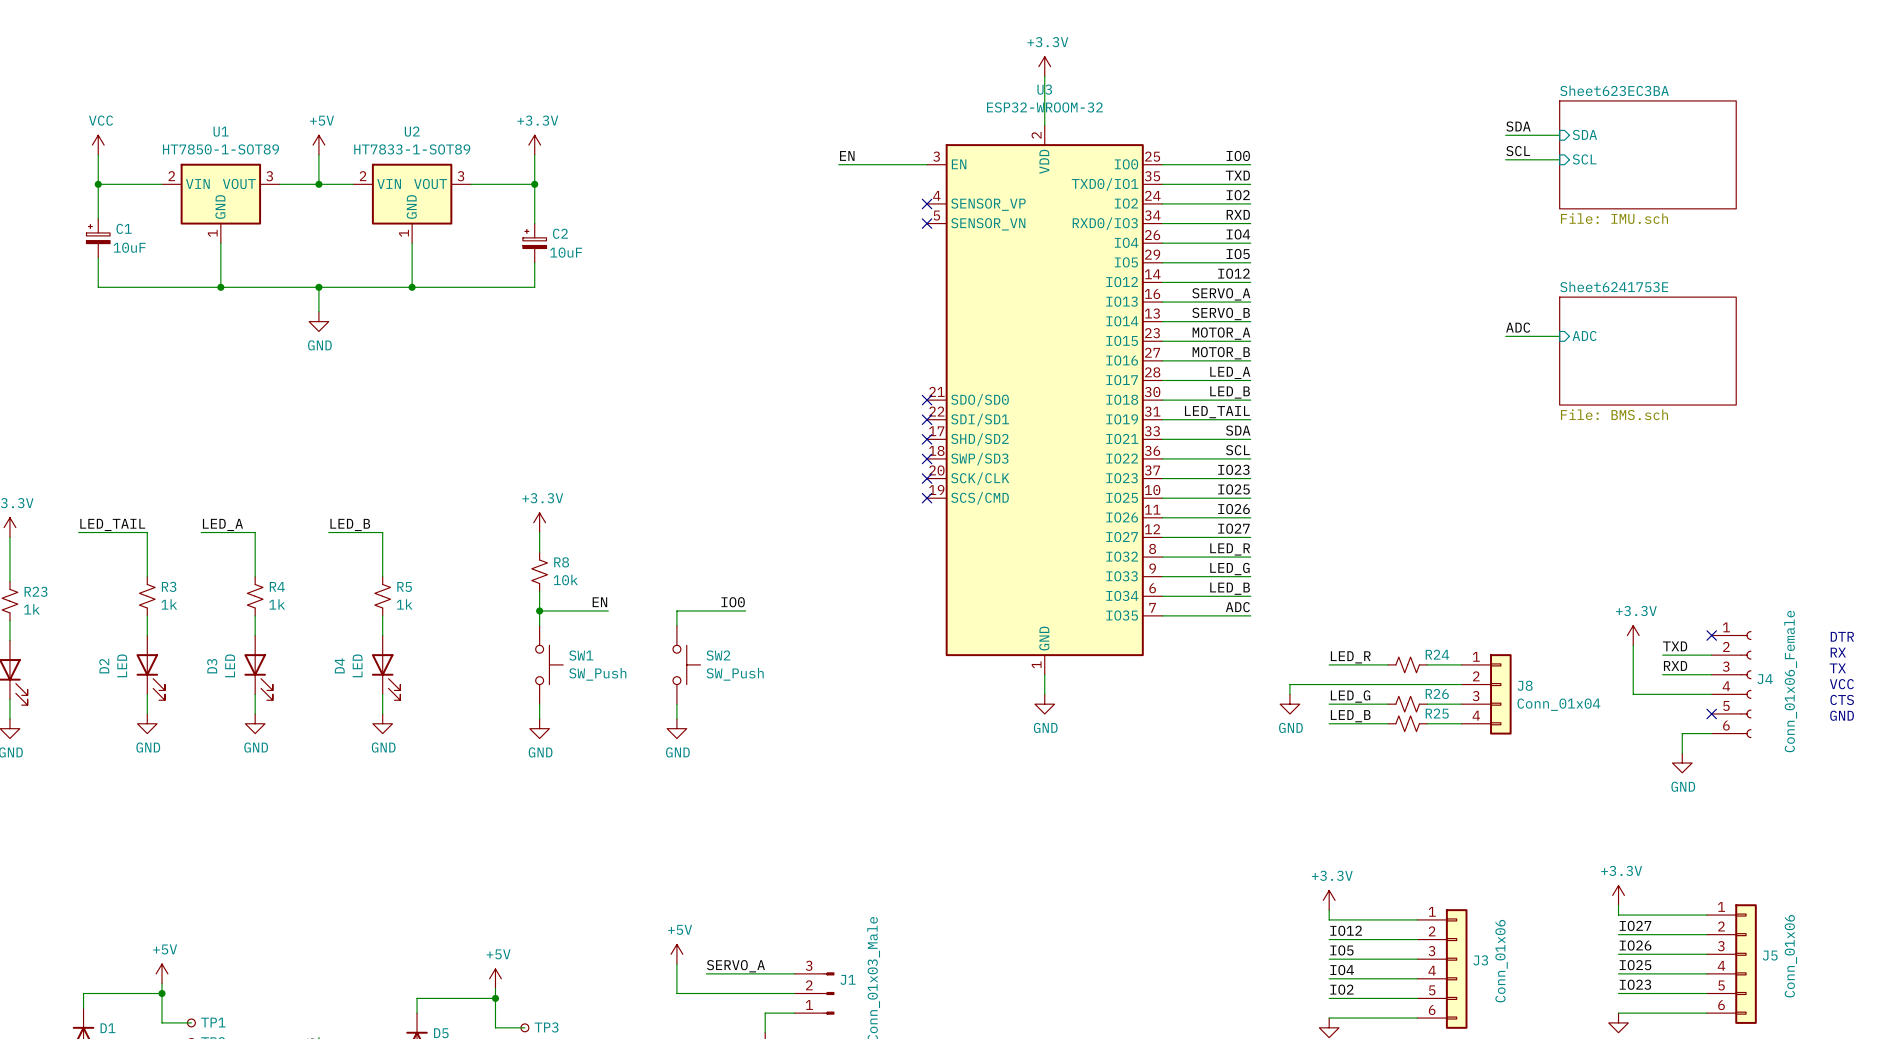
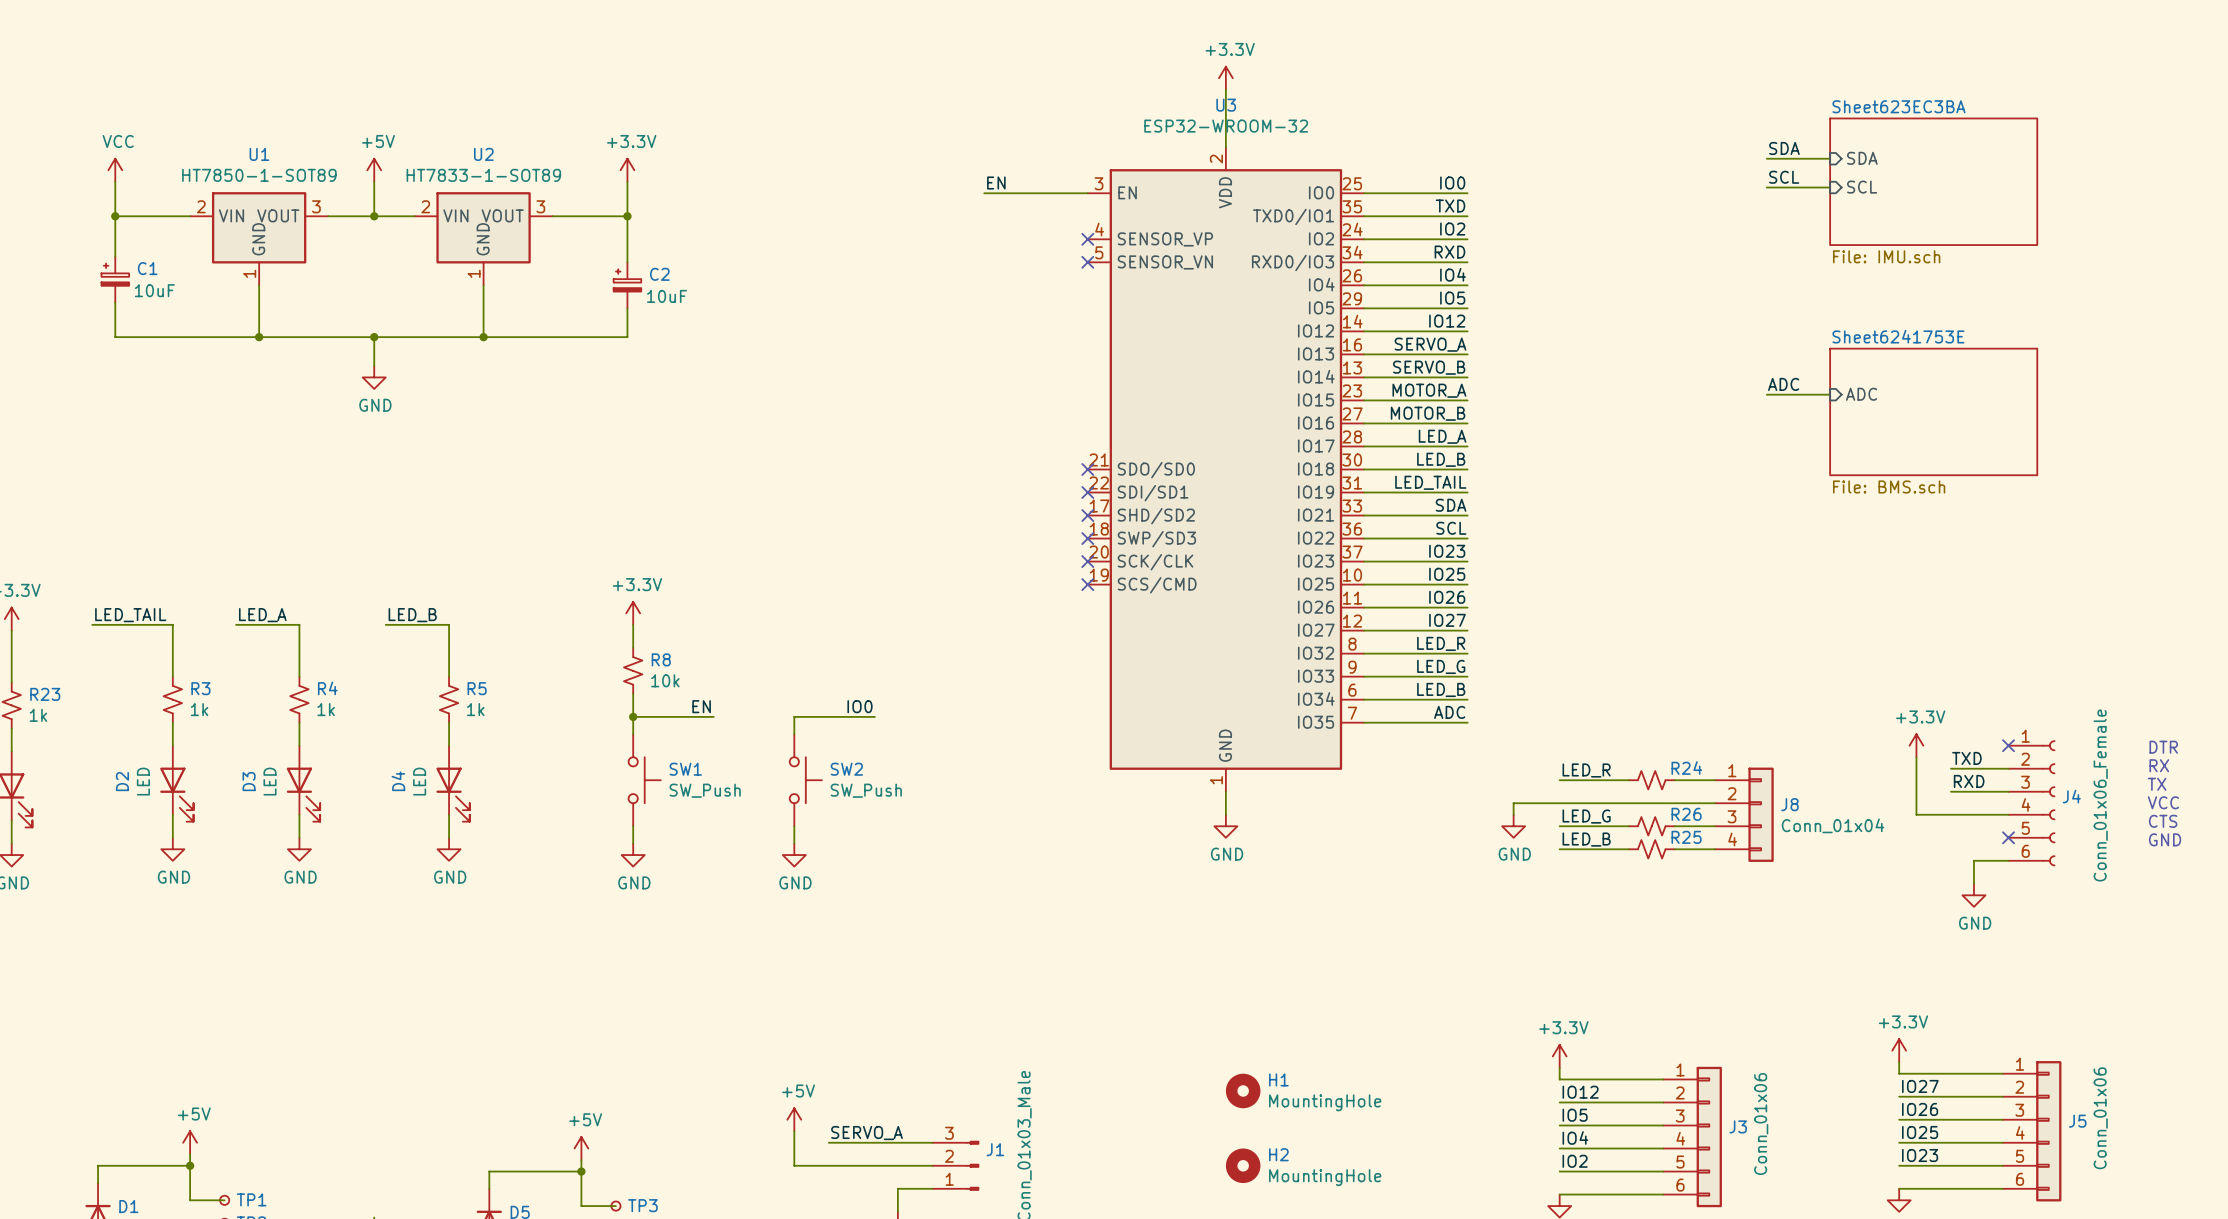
H1: none -> MountingHole (1243, 1090)
H2: none -> MountingHole (1243, 1165)

